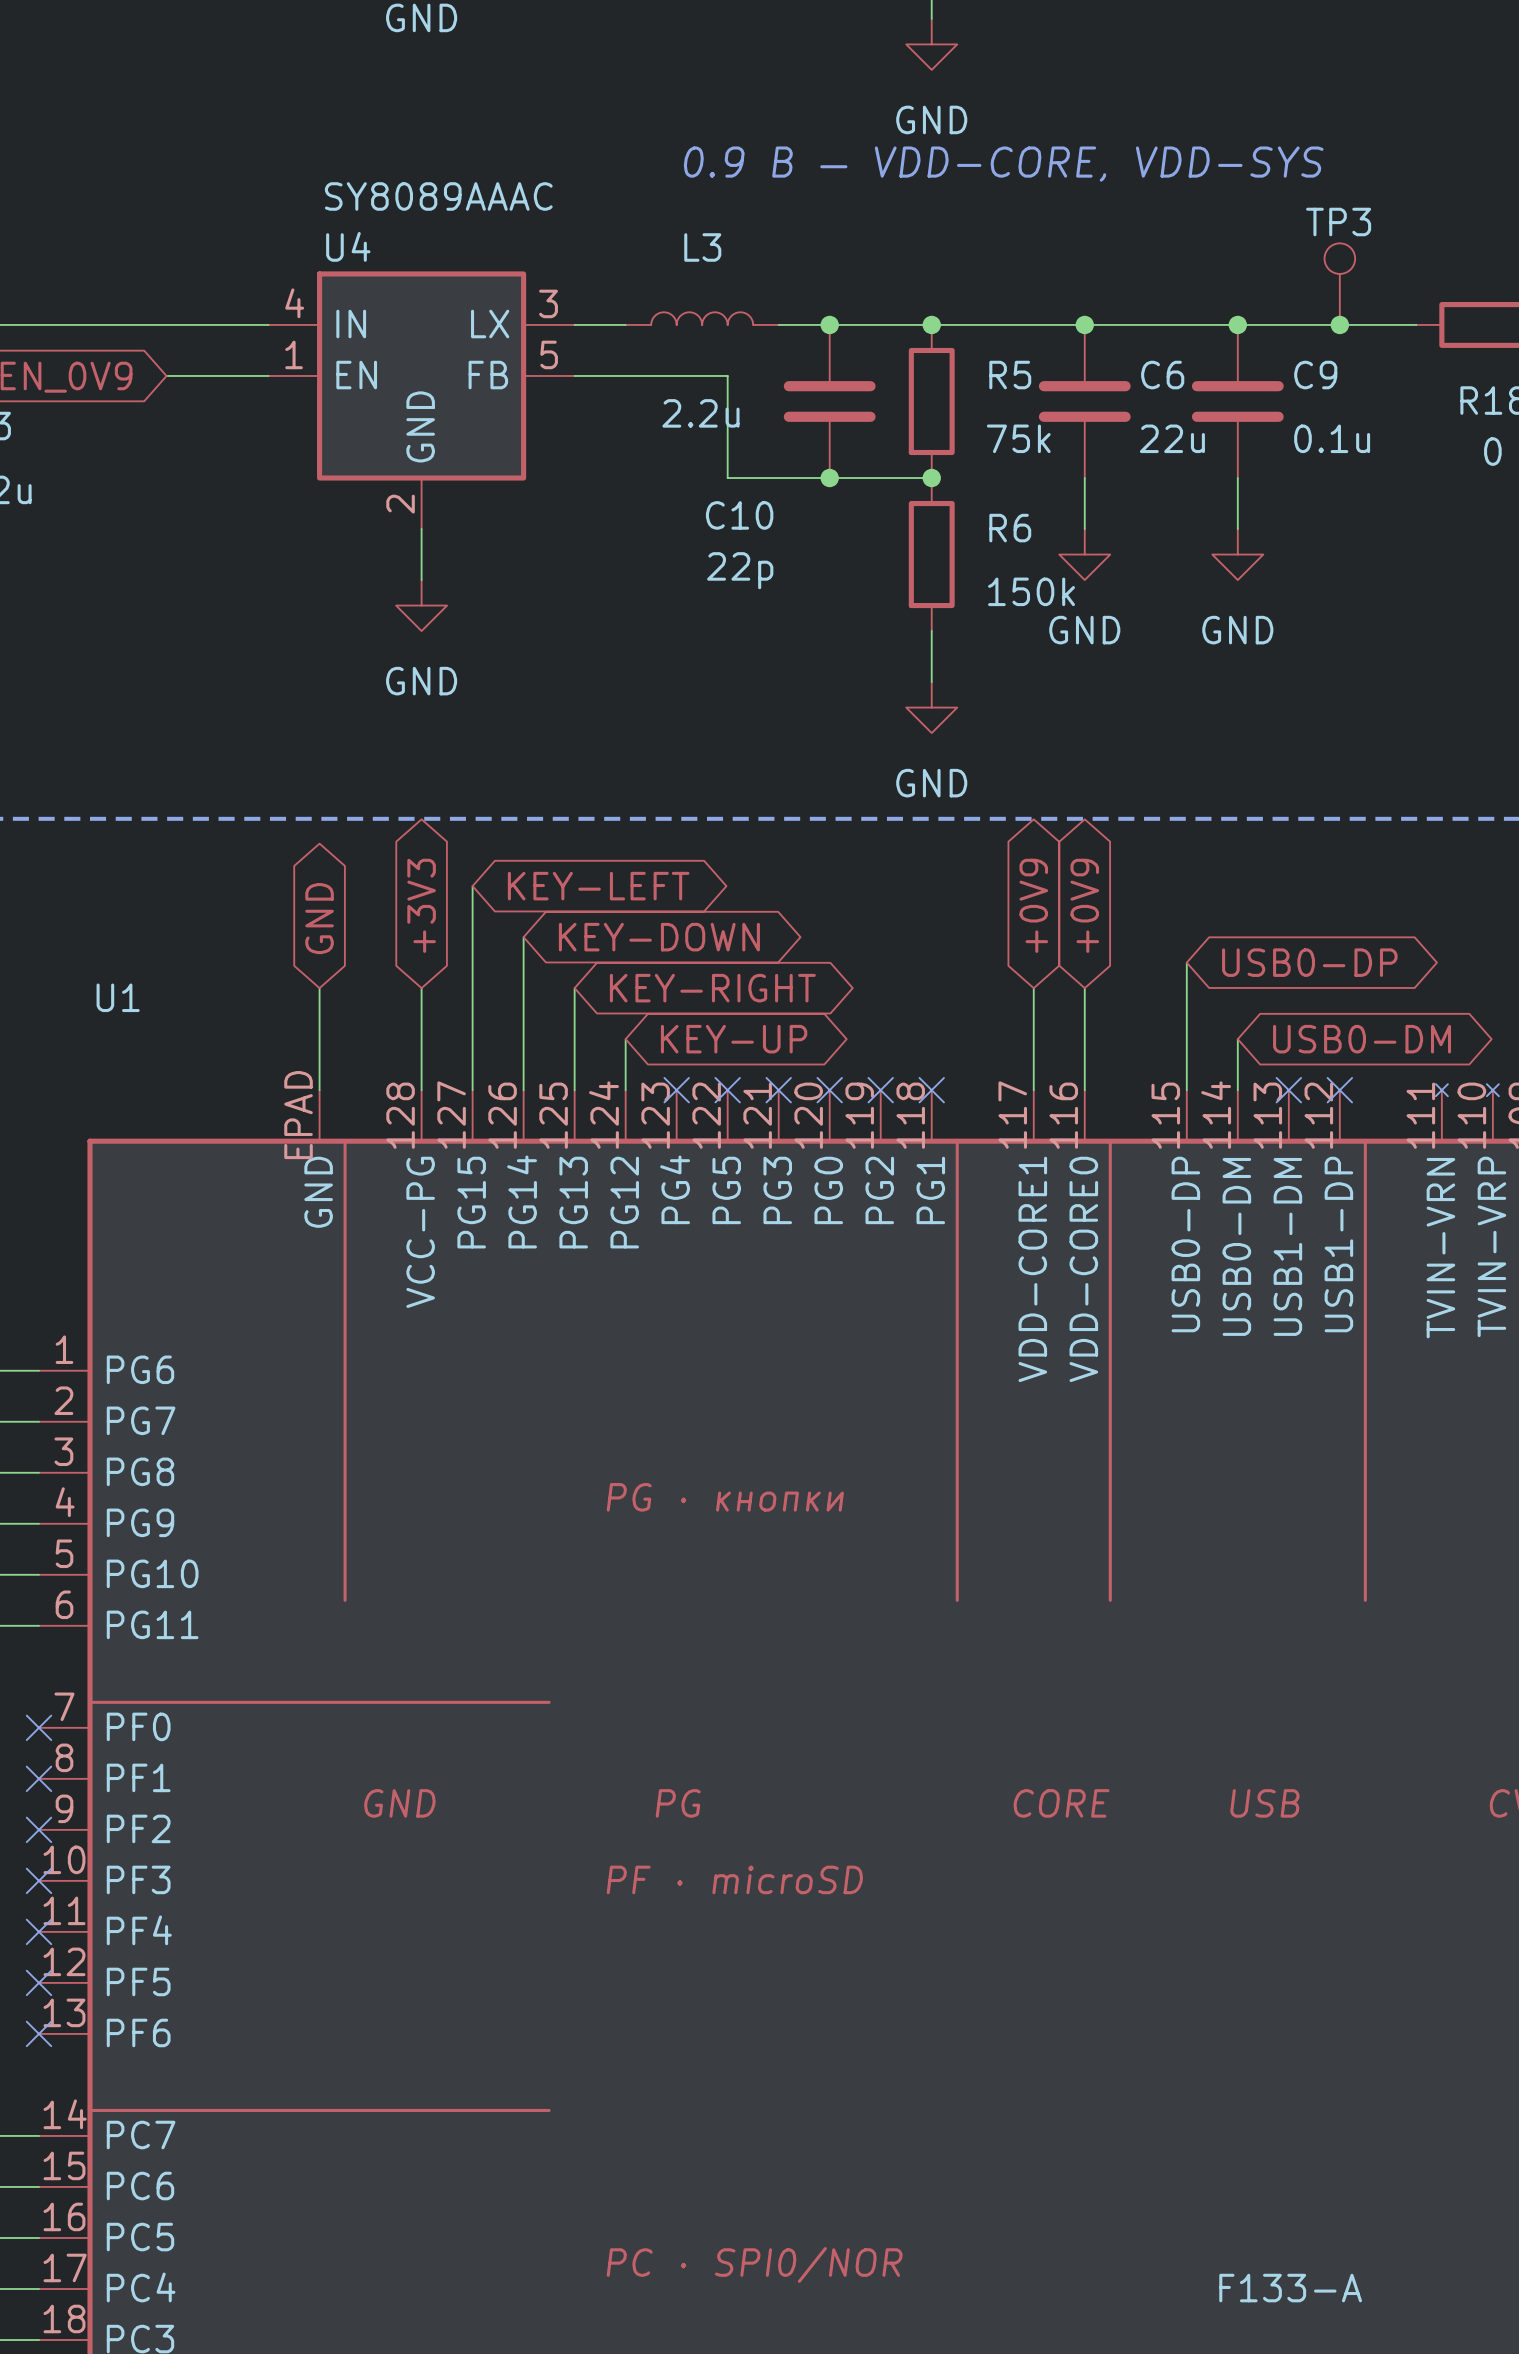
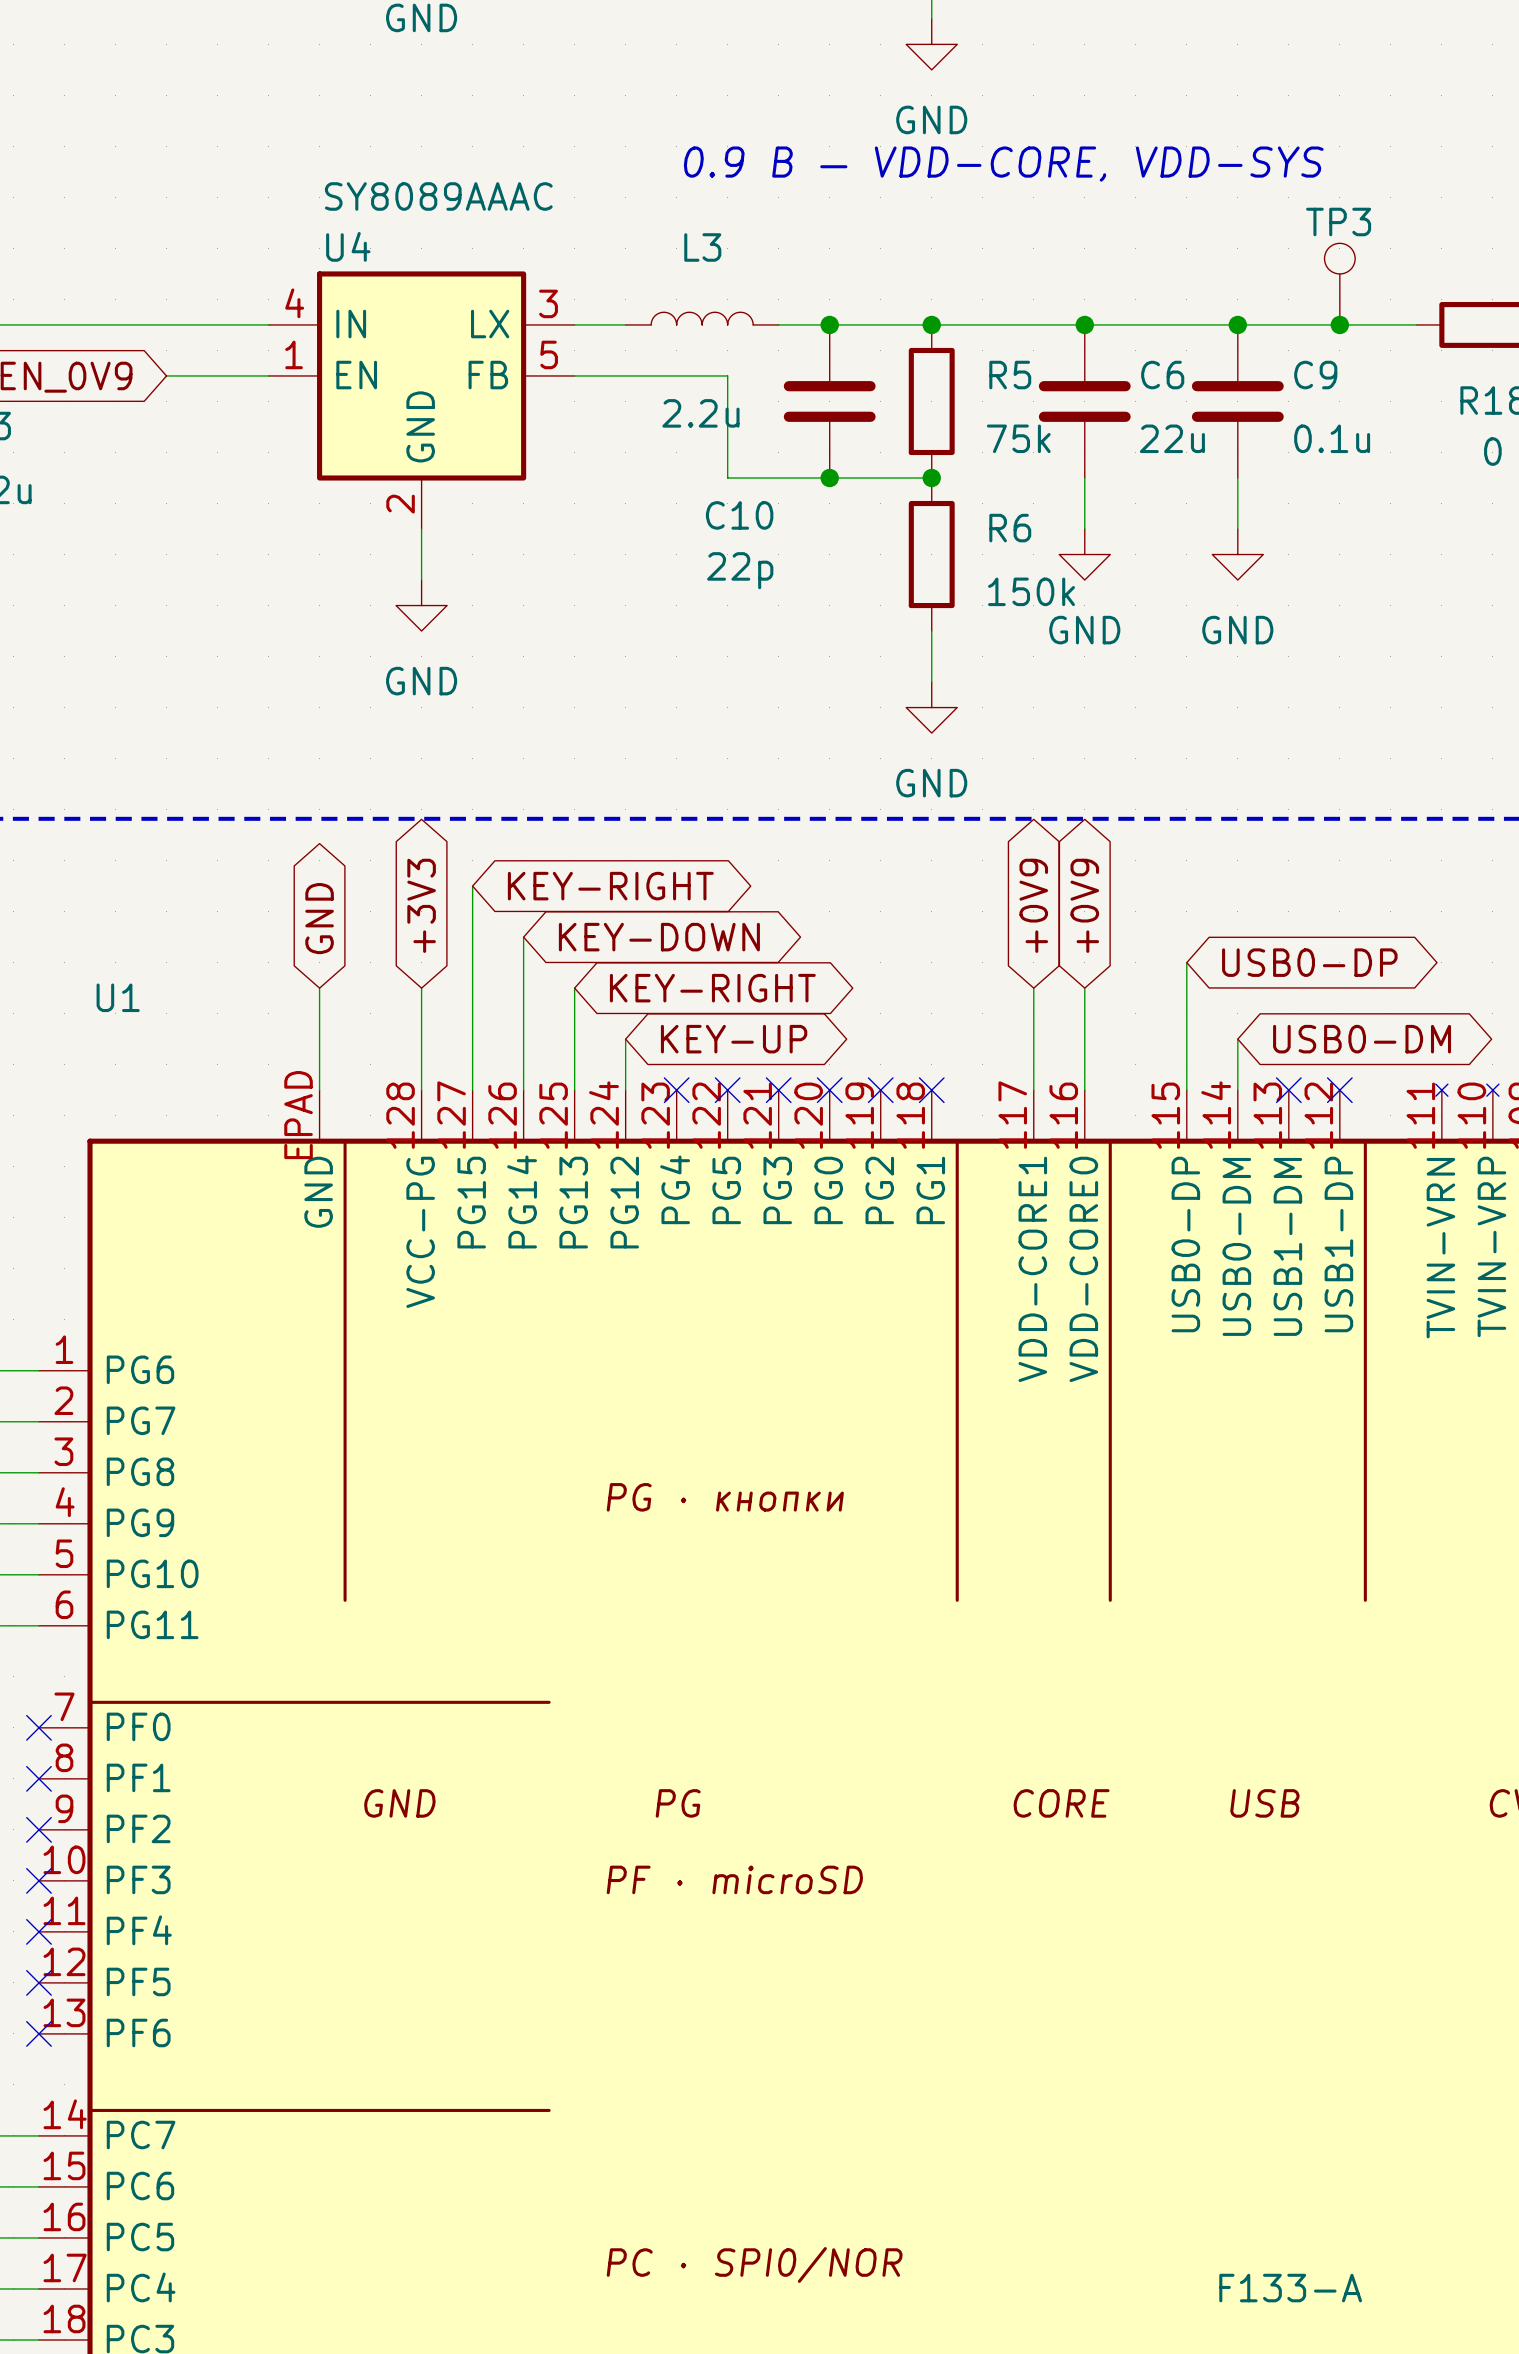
global label: KEY-LEFT (598, 886) -> KEY-RIGHT (610, 886)

